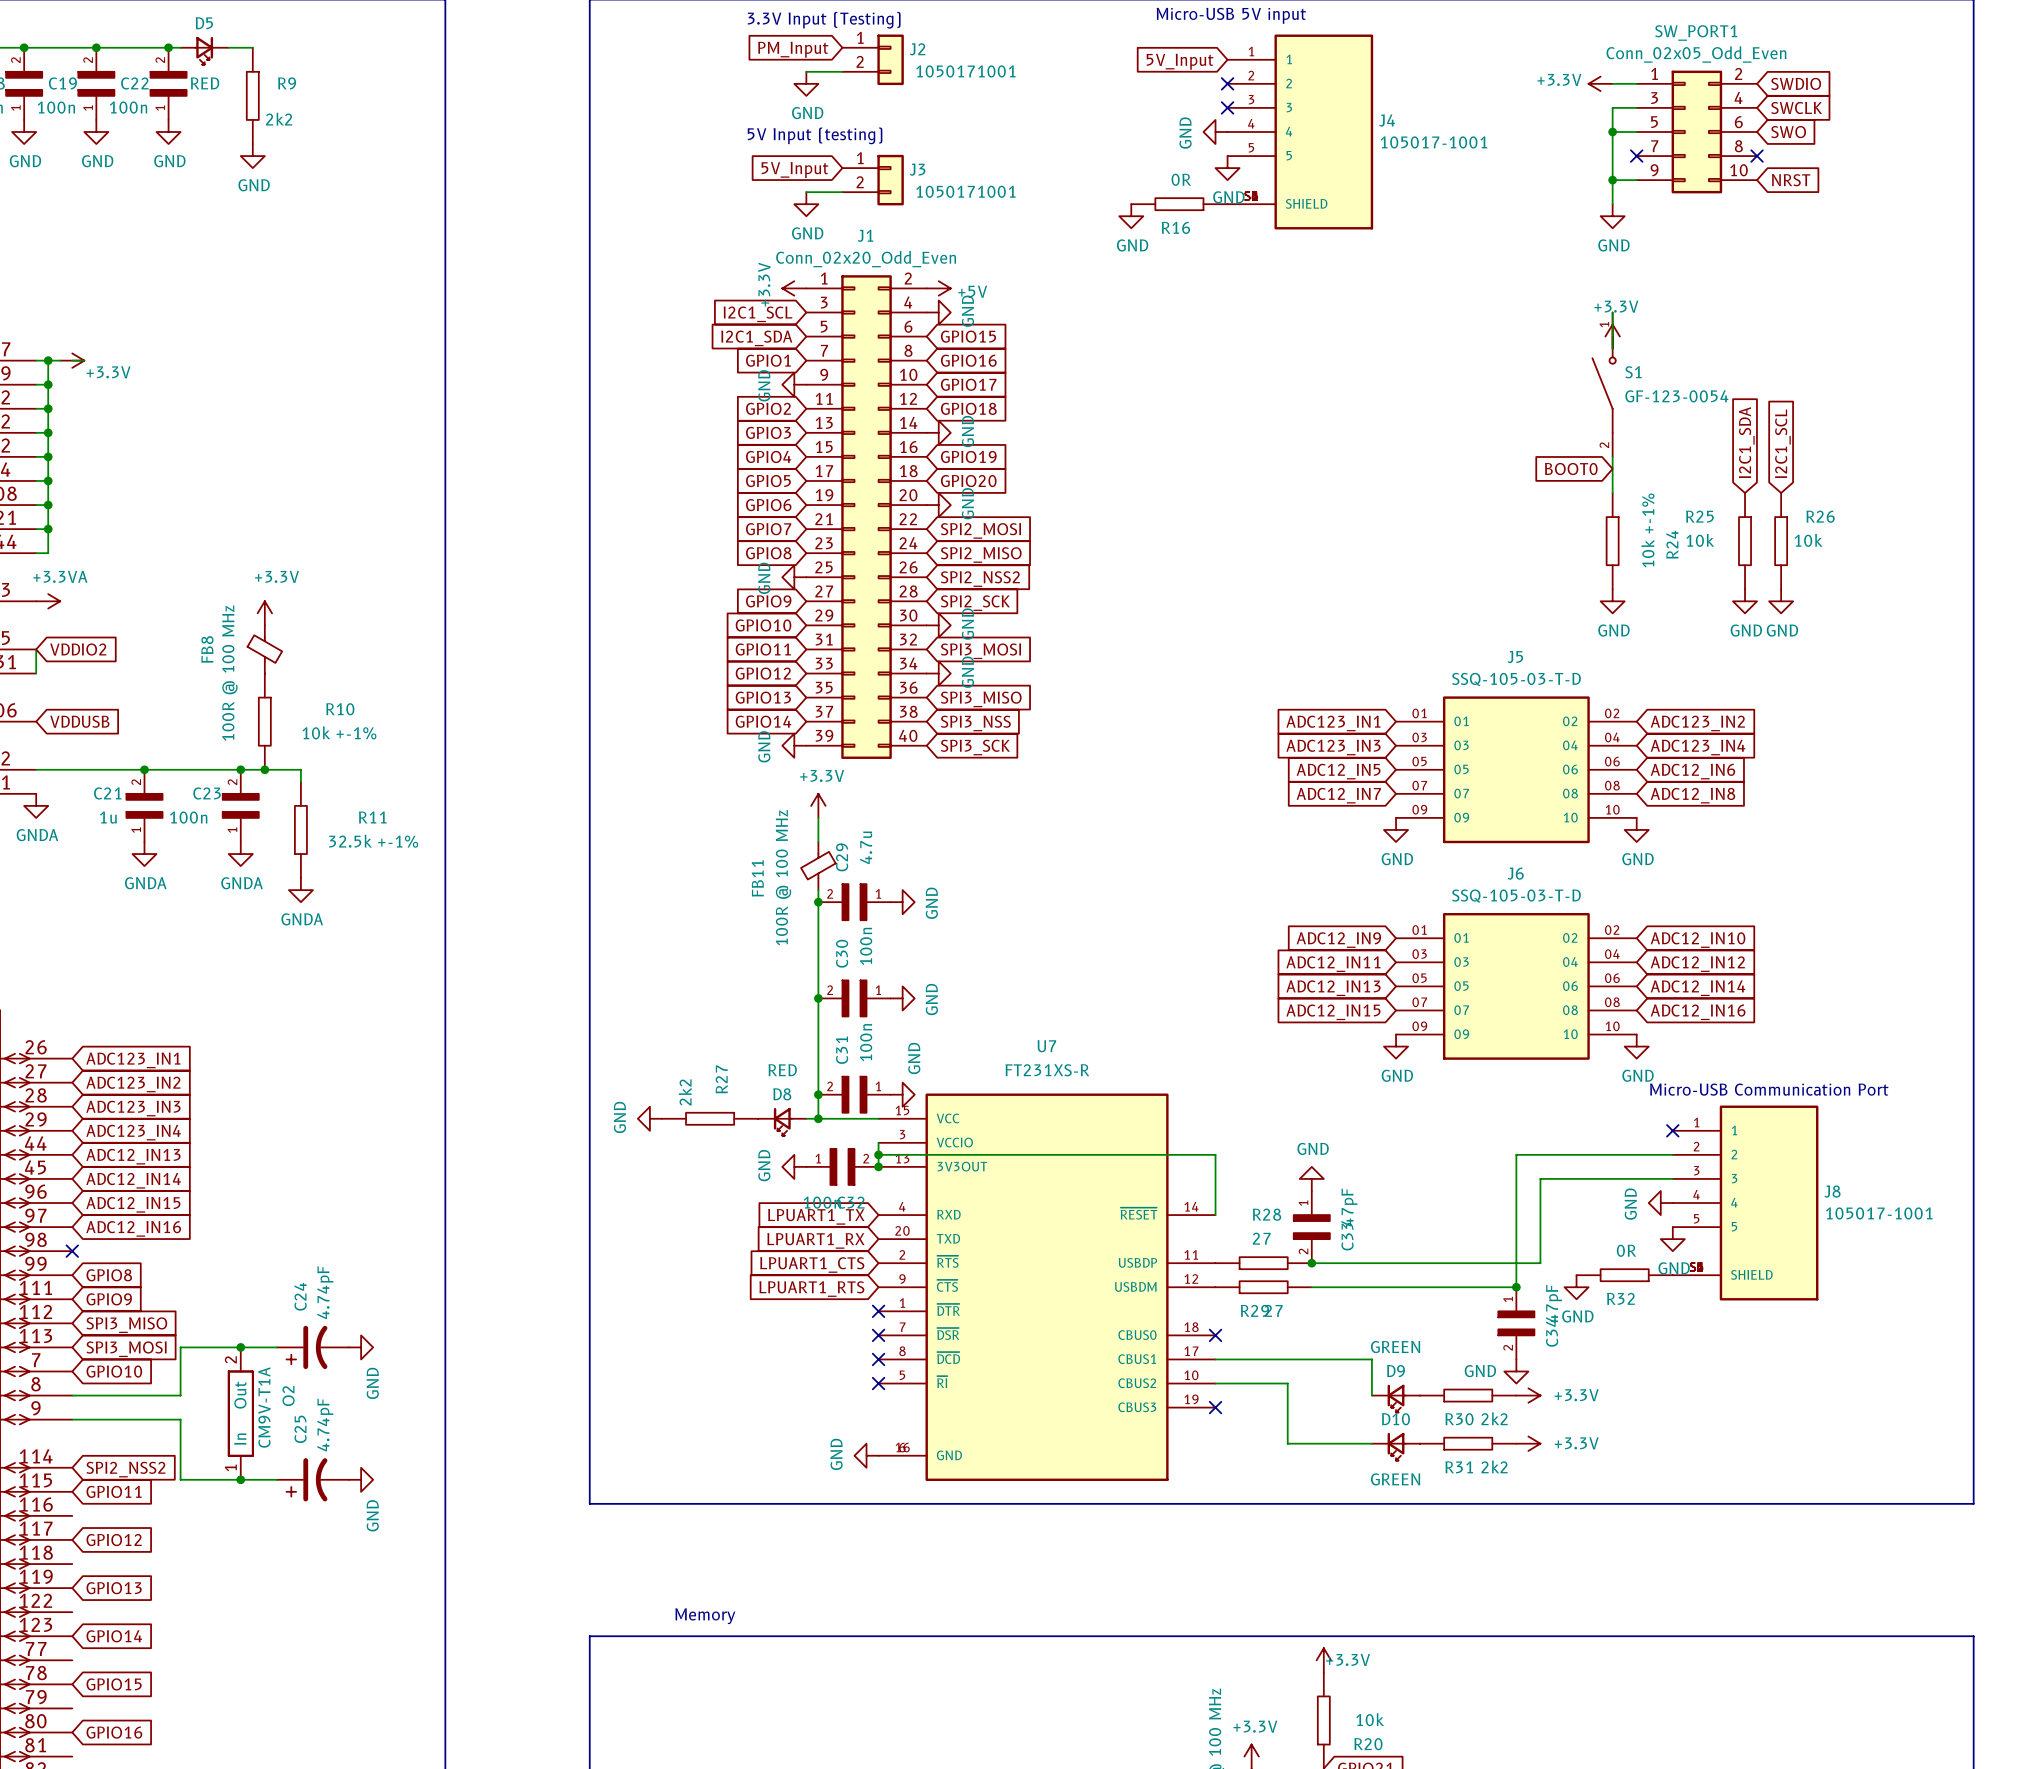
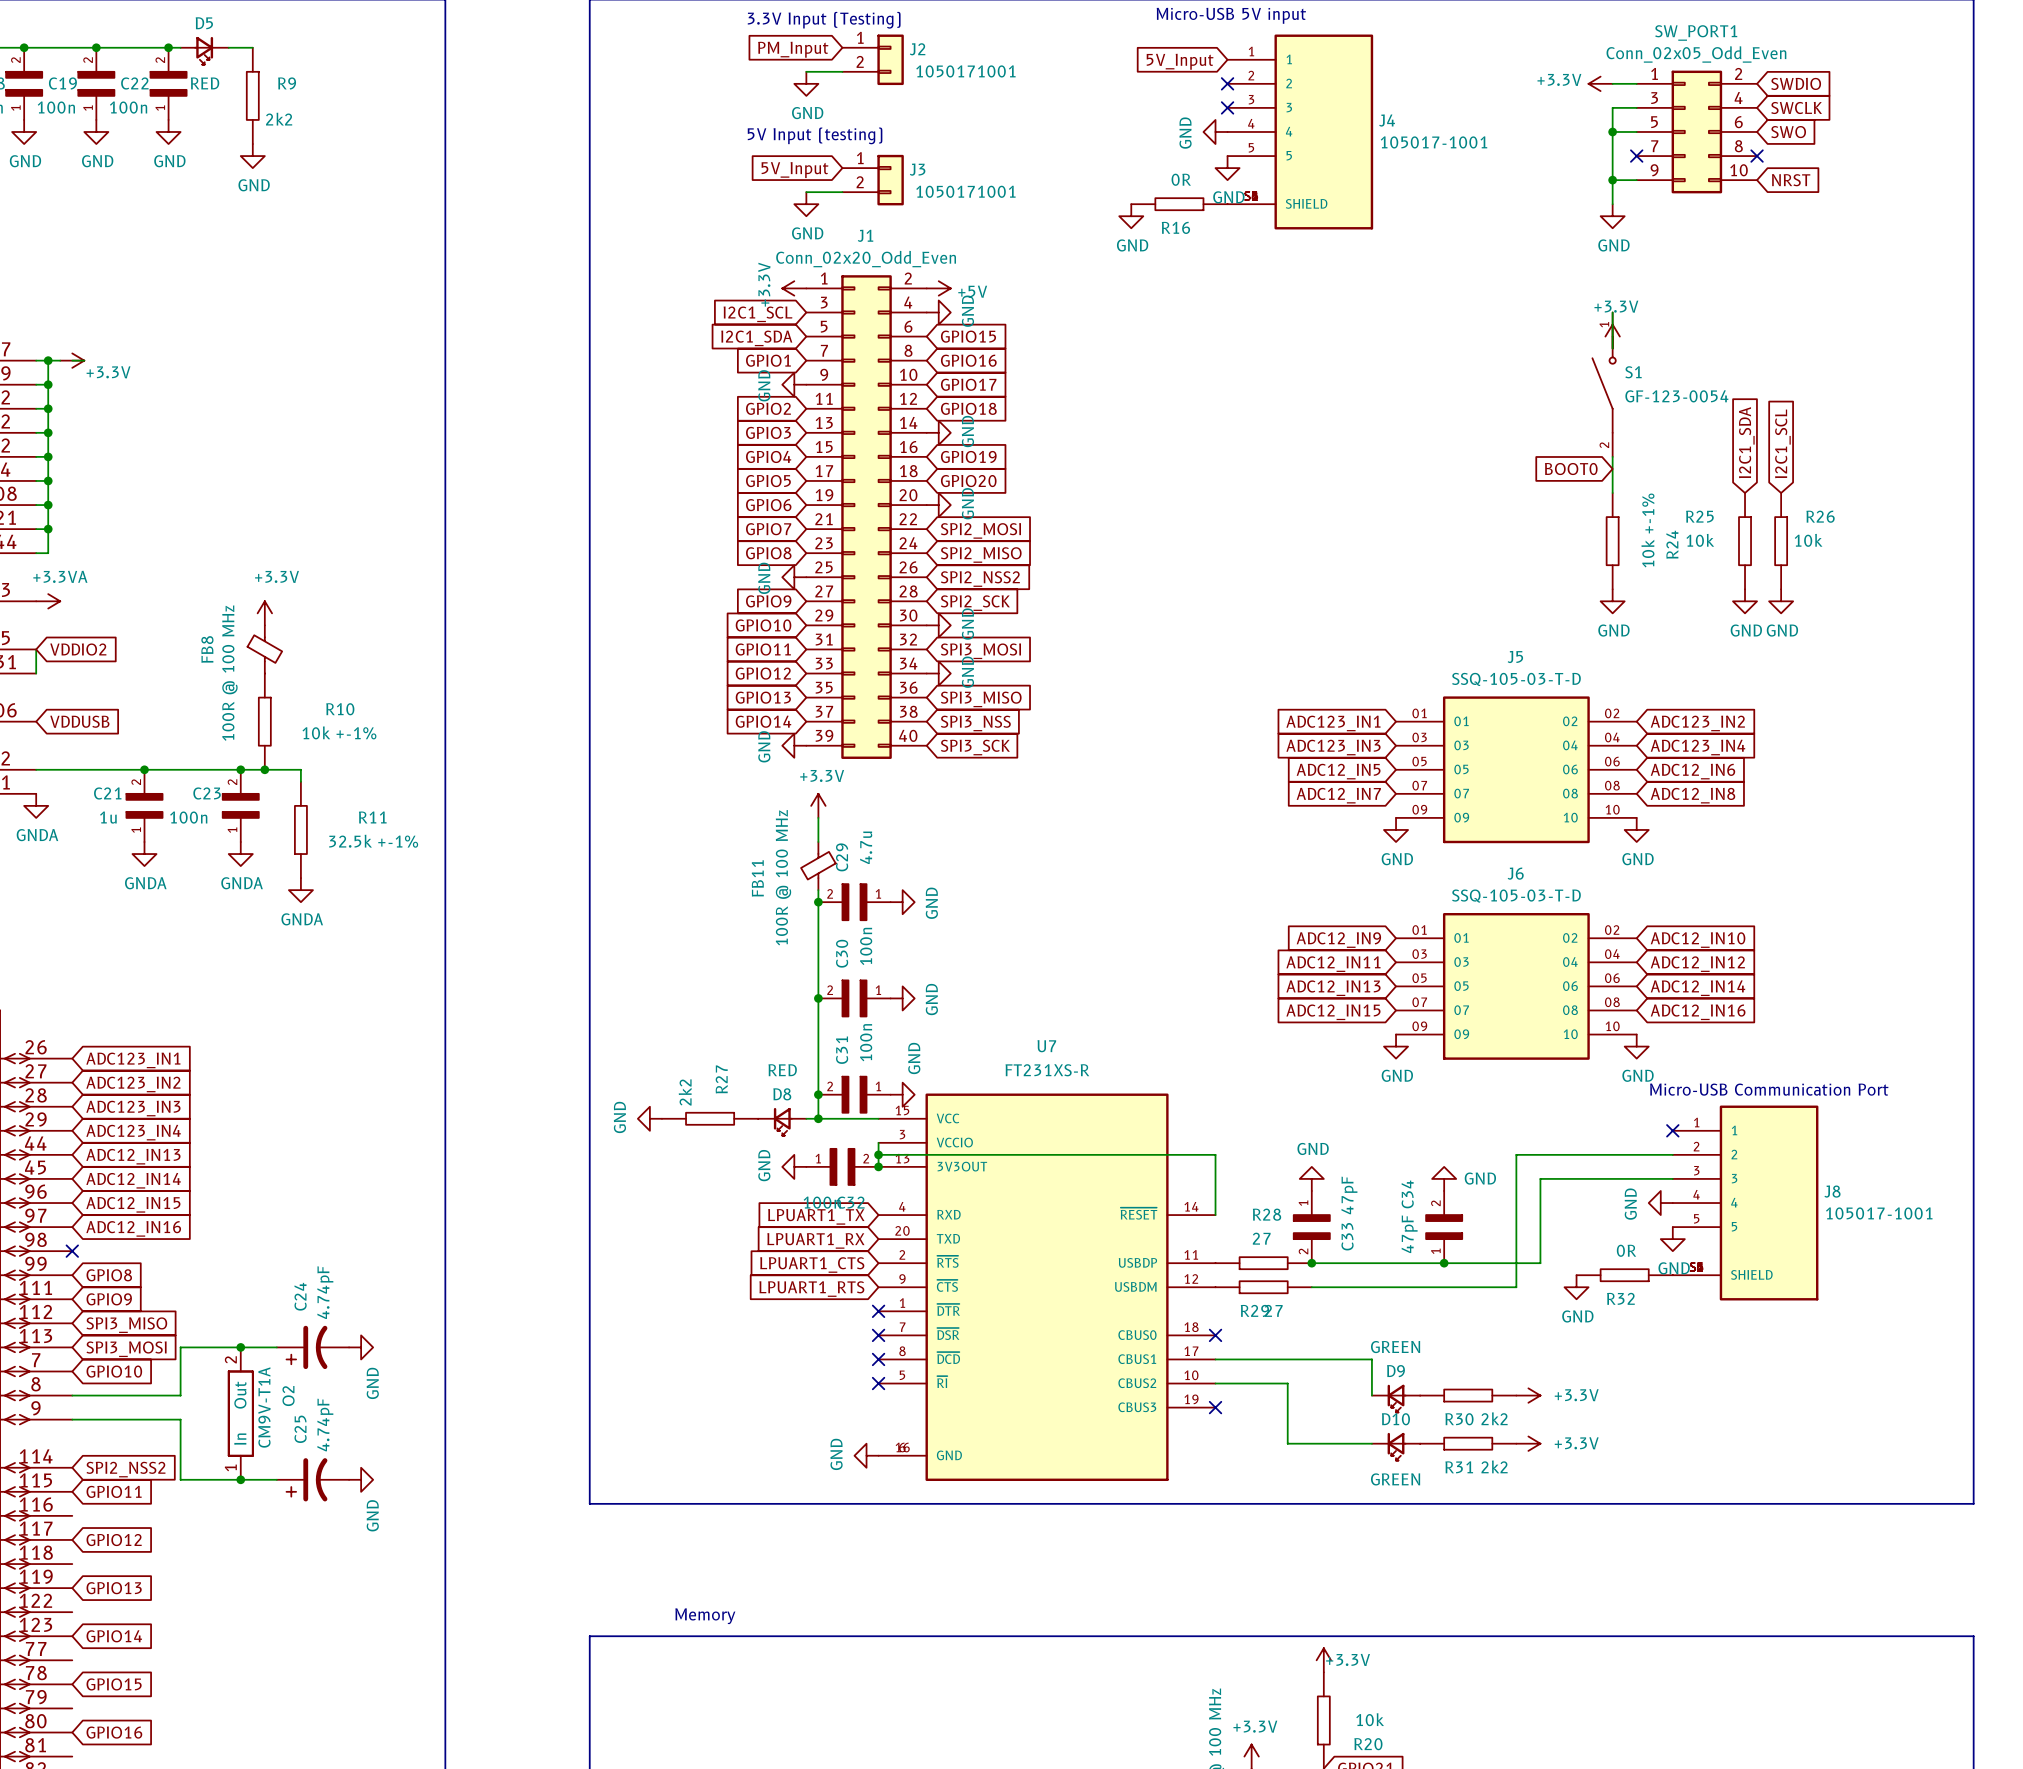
C33 value position: 47pF (1349, 1207) -> 47pF (1349, 1195)
junction: none -> (1444, 1263)
junction: (1516, 1287) -> none
C34 rotation: 0° (1516, 1323) -> 180° (1444, 1227)
C34 position: (1516, 1323) -> (1444, 1227)
C34 name position: C34 (1552, 1332) -> C34 (1407, 1194)
power symbol rotation: 0° (1516, 1371) -> 180° (1444, 1178)
power symbol position: GND (1516, 1371) -> GND (1444, 1178)

